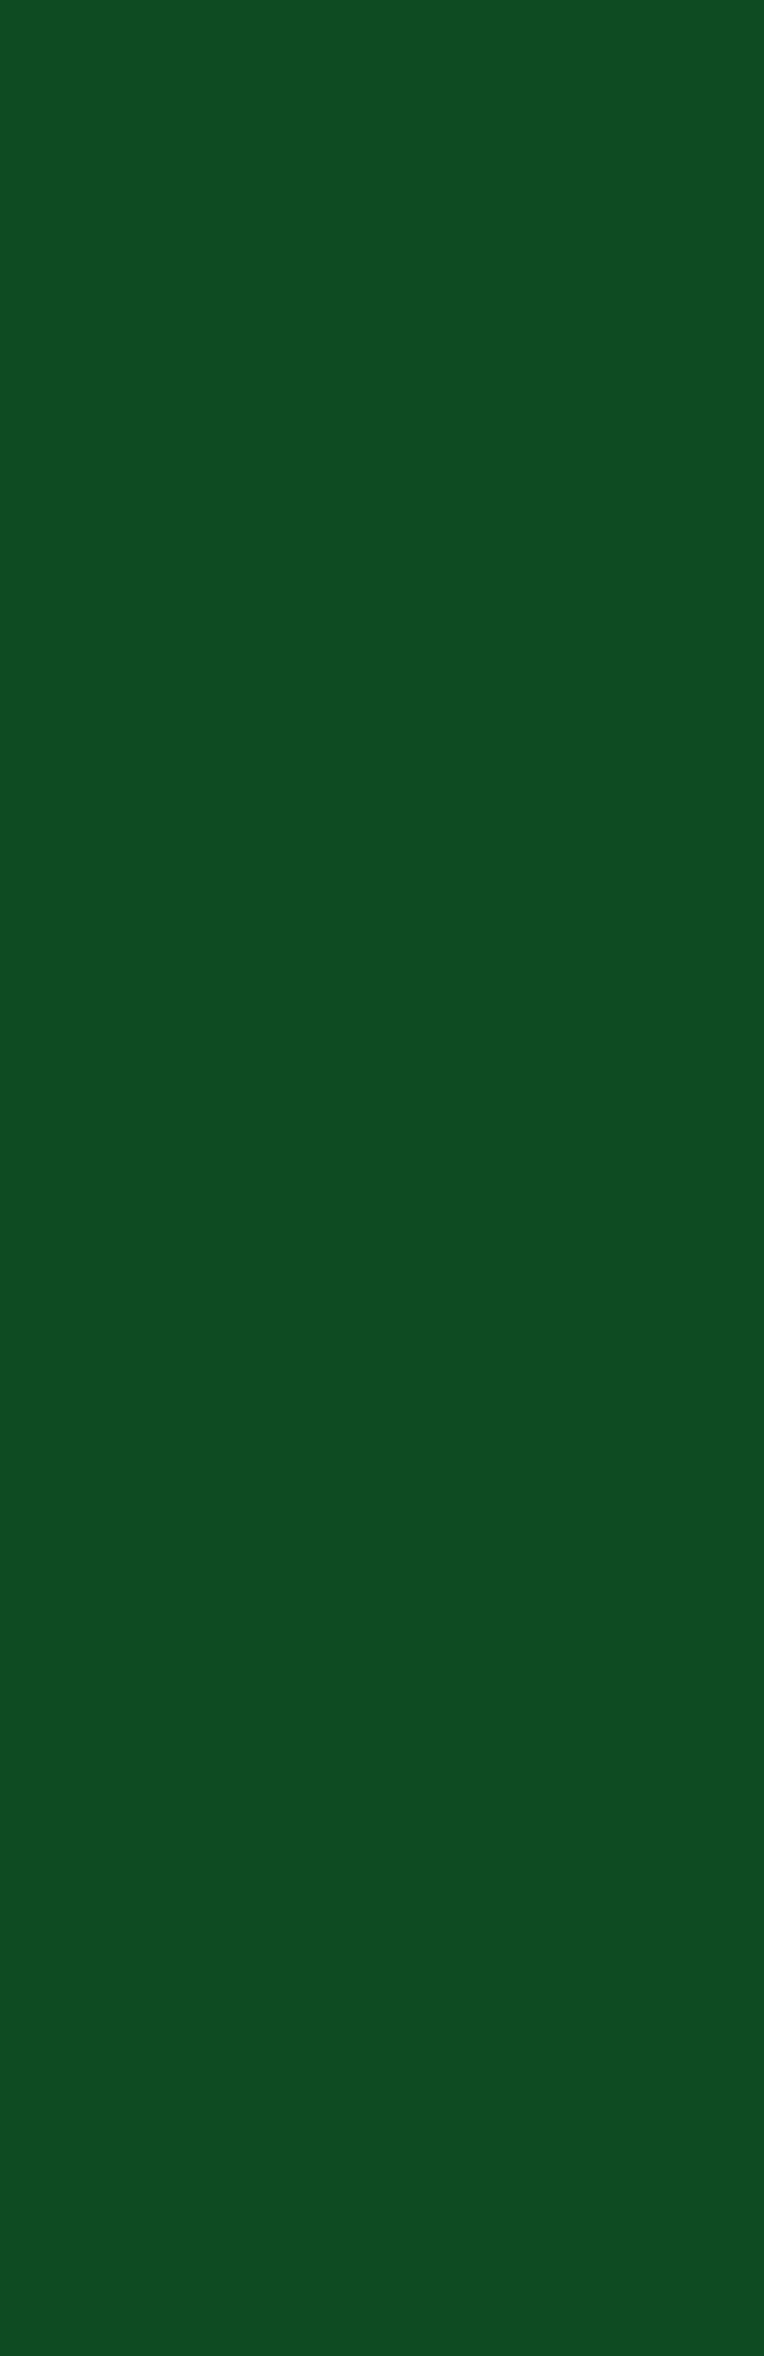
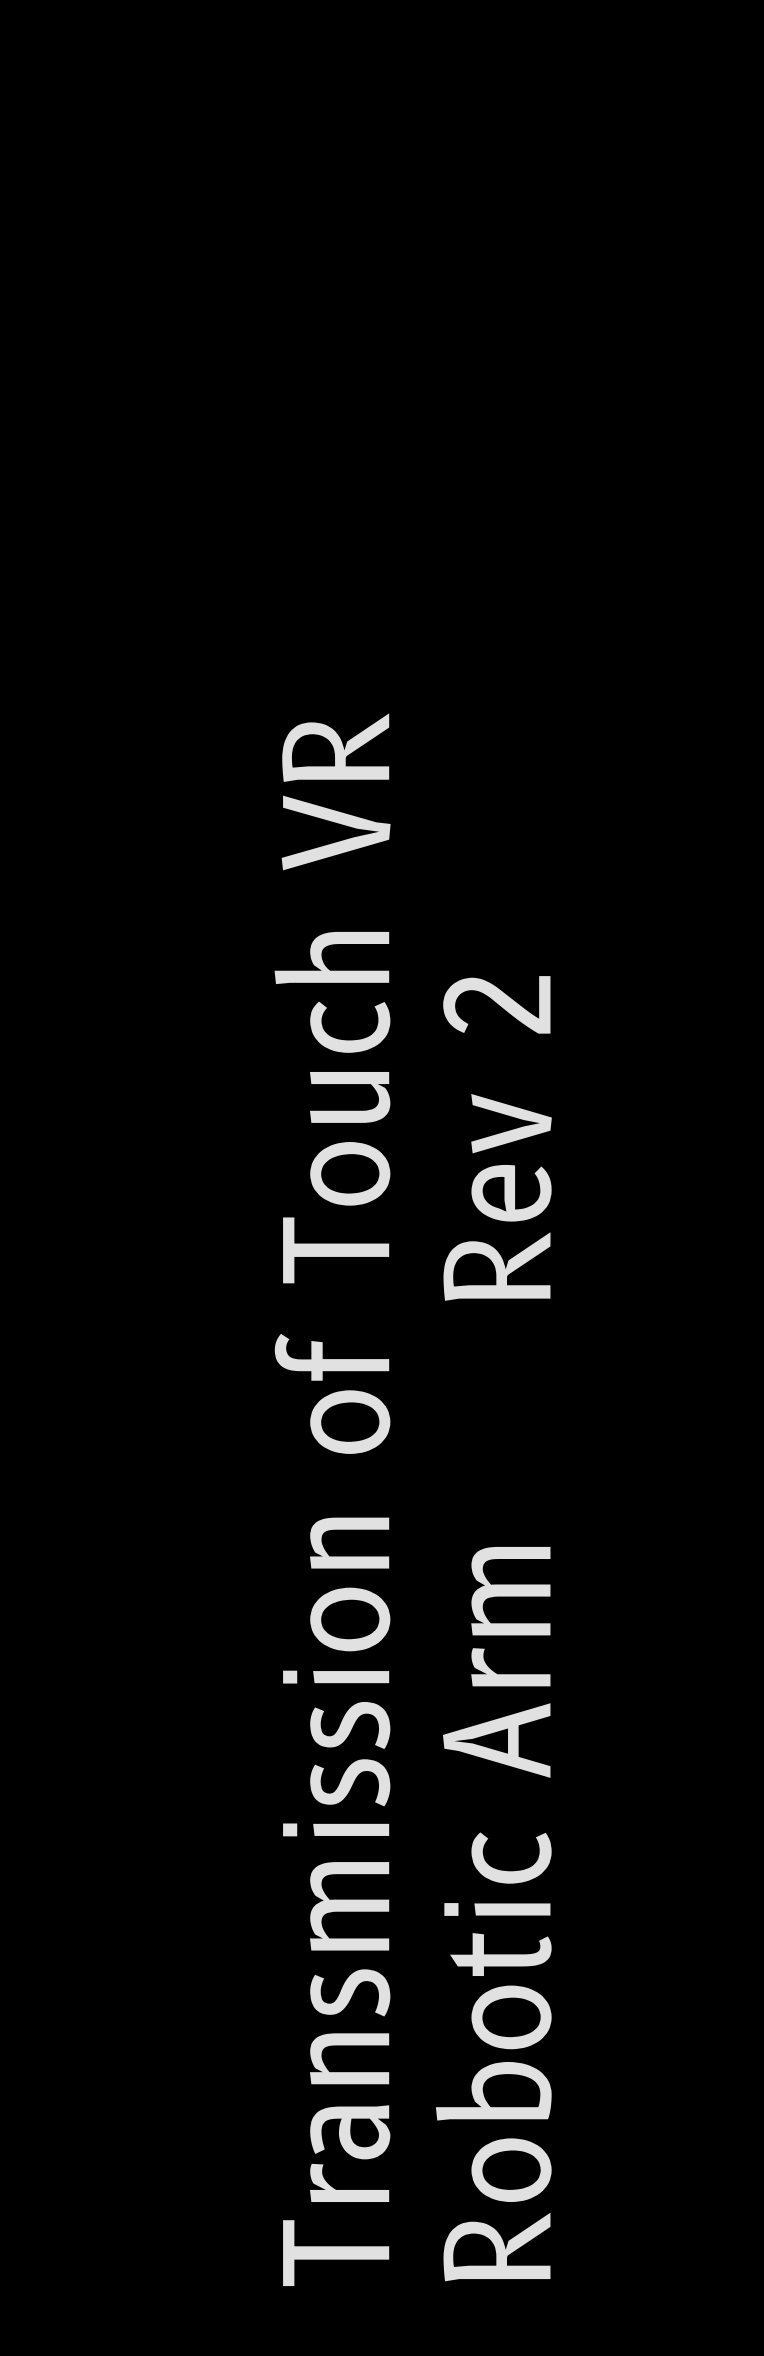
text: none -> Transmission of Touch VR (332, 1499)
text: none -> Robotic Arm Rev 2 (493, 1628)

